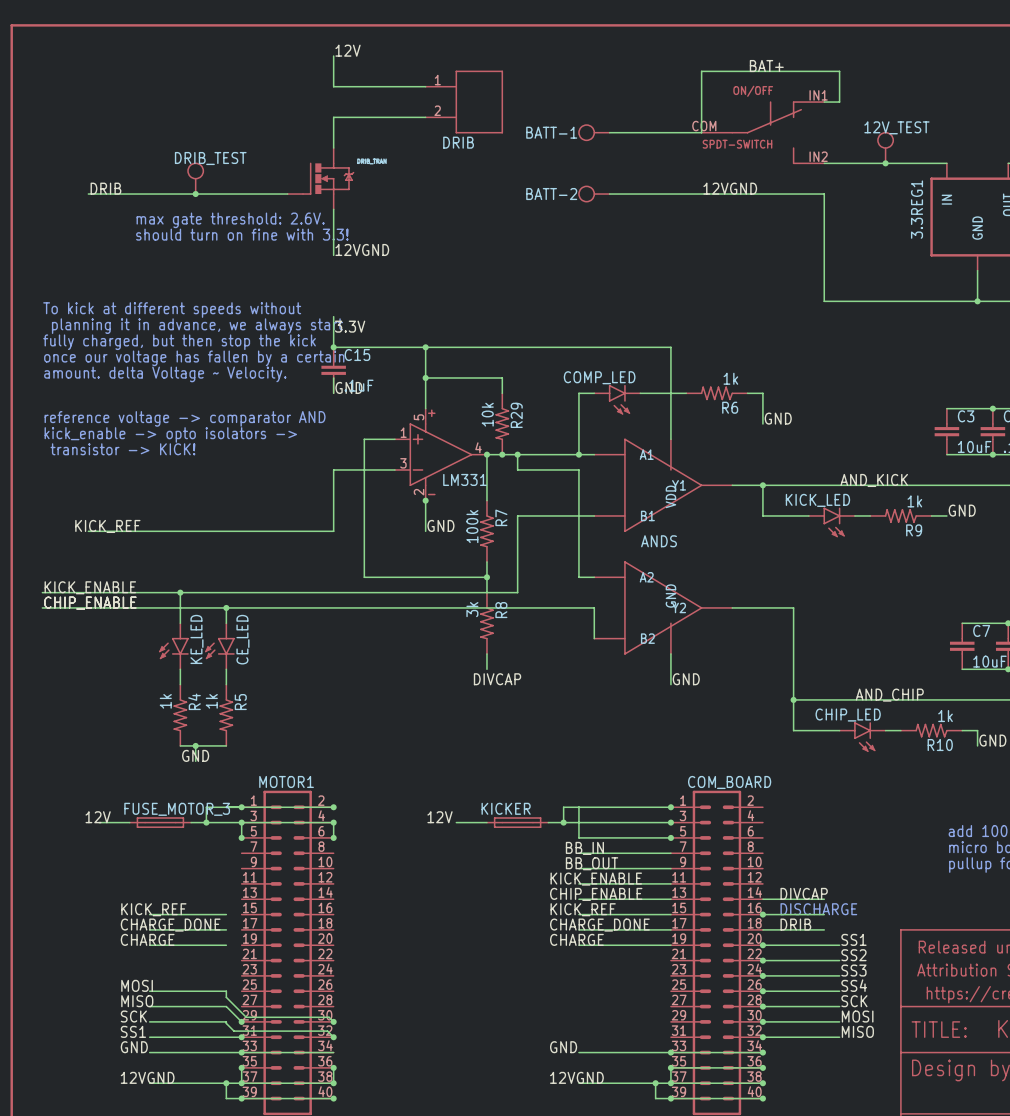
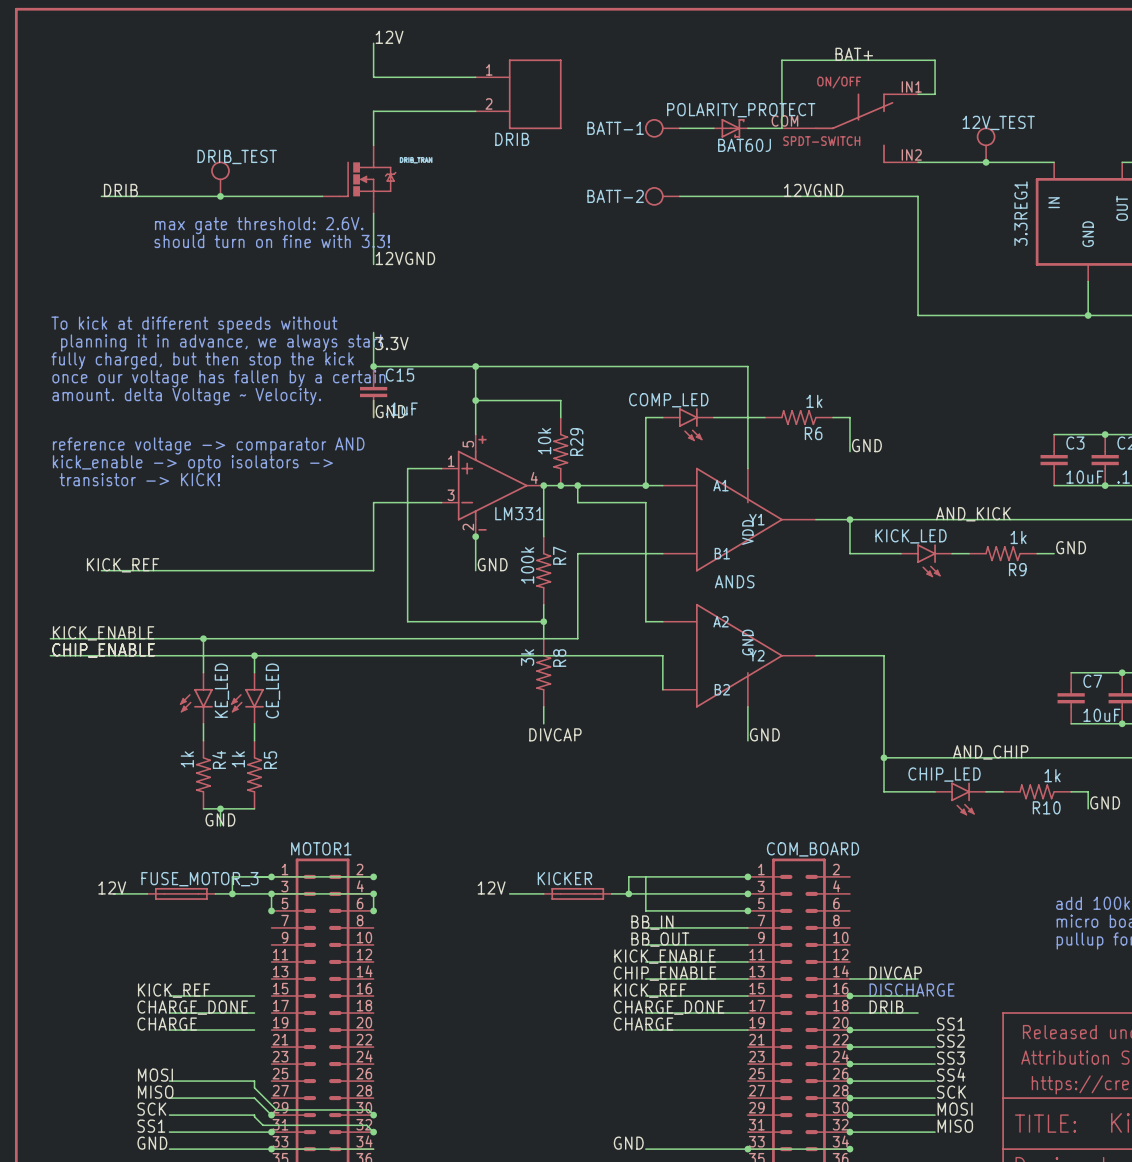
POLARITY_PROTECT: none -> BAT60J (730, 128)

